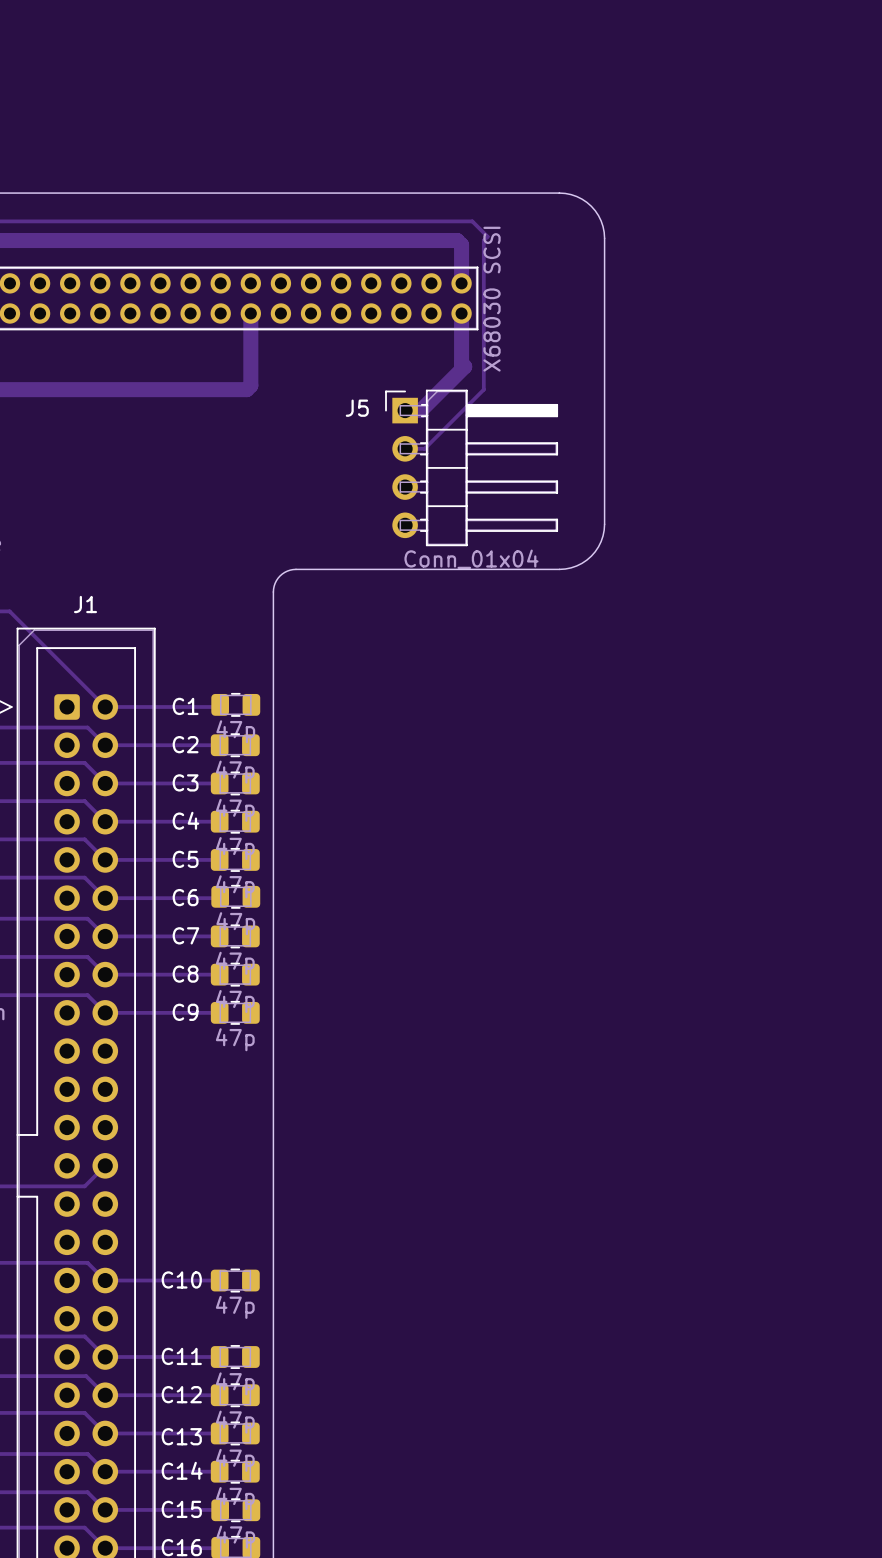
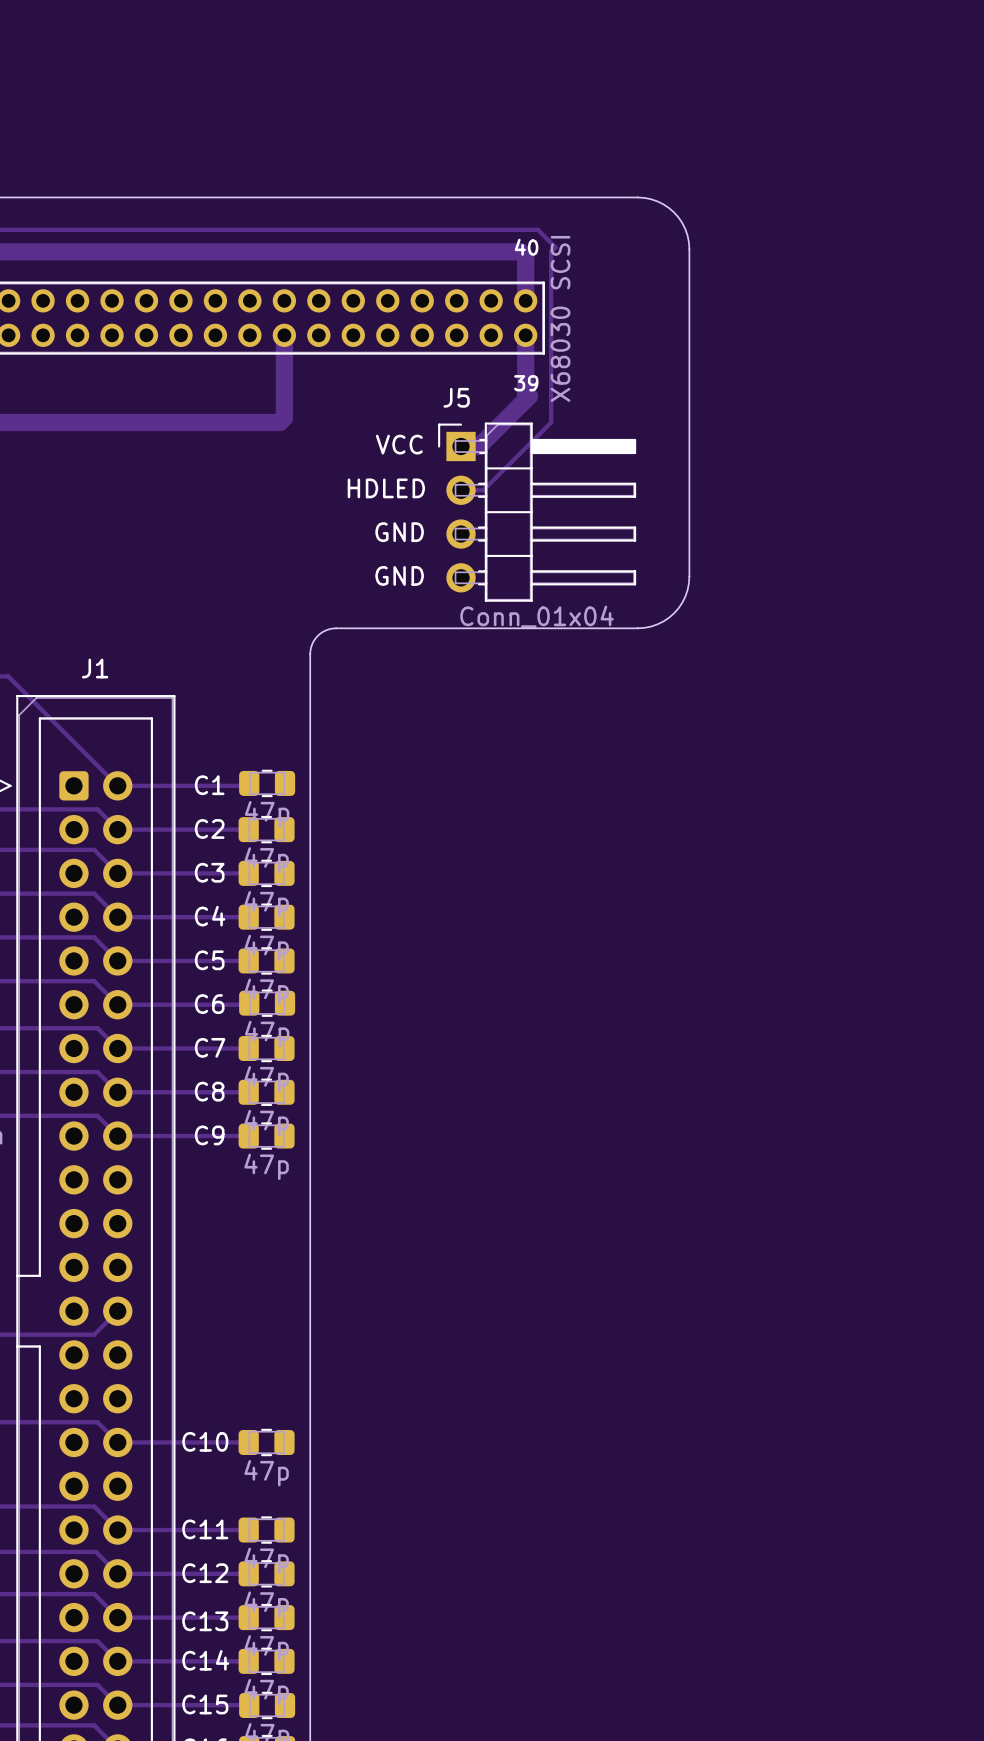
text: none -> 40 (526, 247)
text: none -> 39 (526, 383)
text: none -> VCC (399, 444)
J5 name position: J5 (357, 408) -> J5 (456, 397)
text: none -> HDLED (386, 488)
text: none -> GND (399, 532)
text: none -> GND (399, 575)

